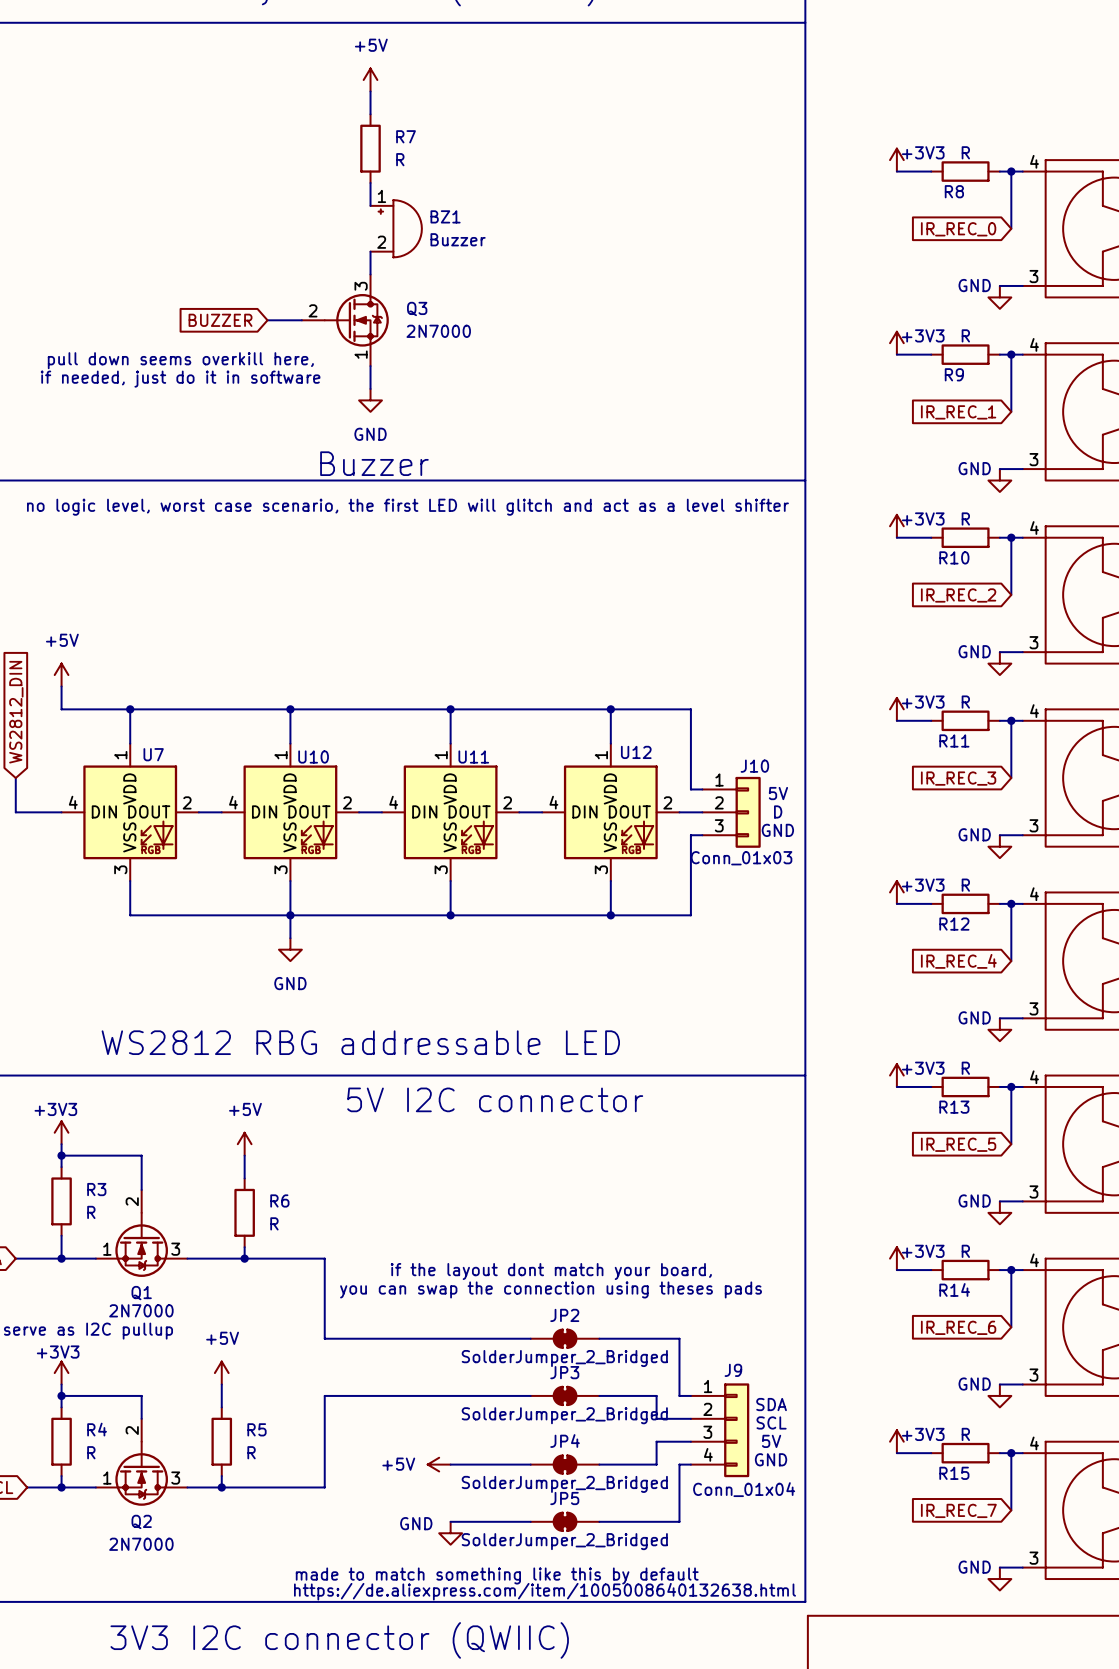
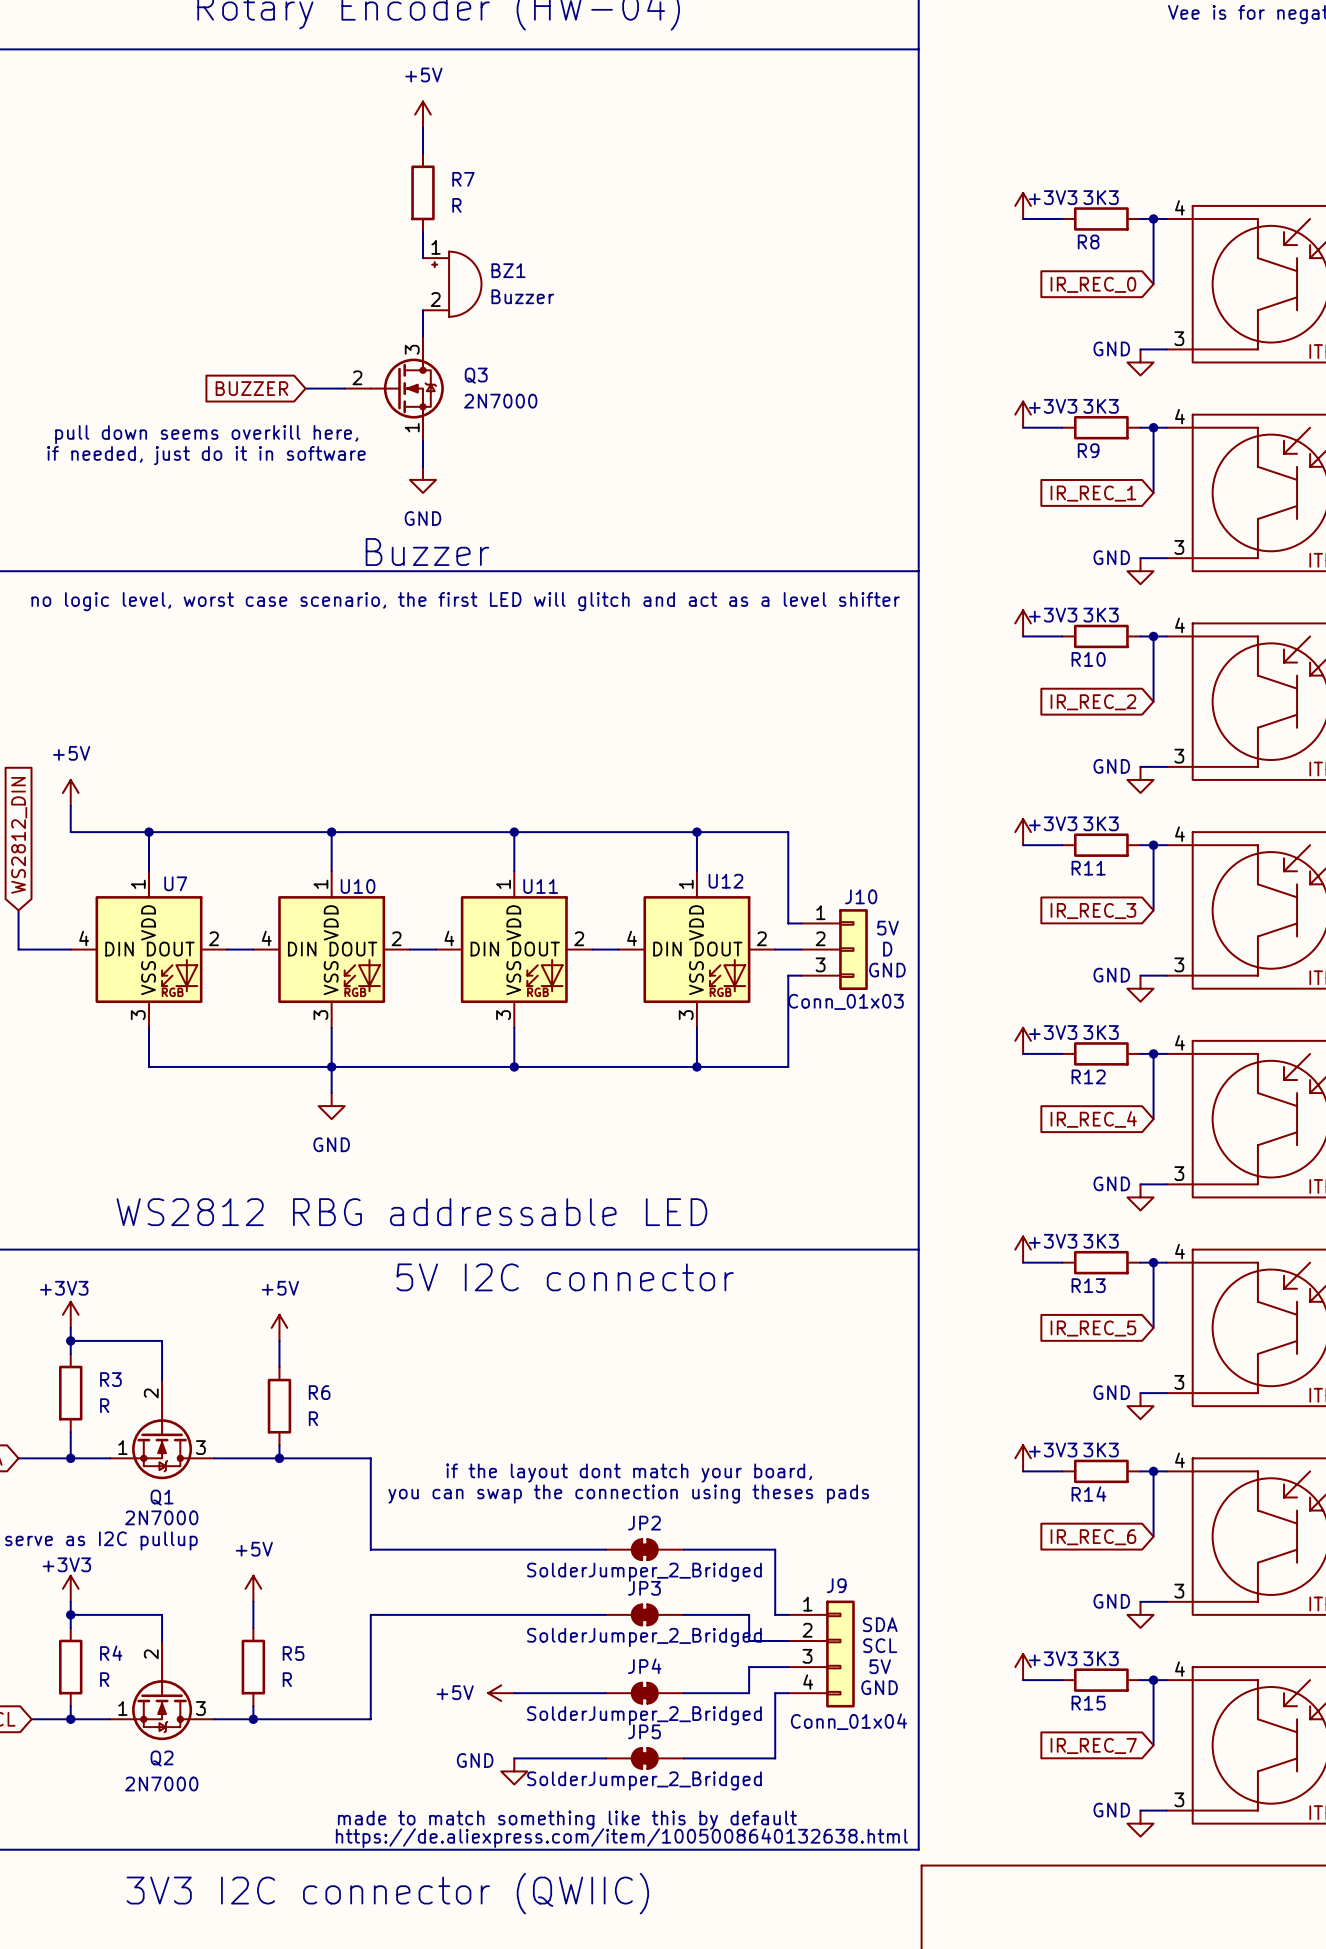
R8 value: R (965, 152) -> 3K3 (1101, 197)
R9 value: R (965, 335) -> 3K3 (1101, 406)
R10 value: R (965, 518) -> 3K3 (1101, 615)
R11 value: R (965, 702) -> 3K3 (1101, 823)
R12 value: R (965, 885) -> 3K3 (1101, 1032)
R13 value: R (965, 1068) -> 3K3 (1101, 1241)
R14 value: R (965, 1251) -> 3K3 (1101, 1450)
R15 value: R (965, 1434) -> 3K3 (1101, 1658)

